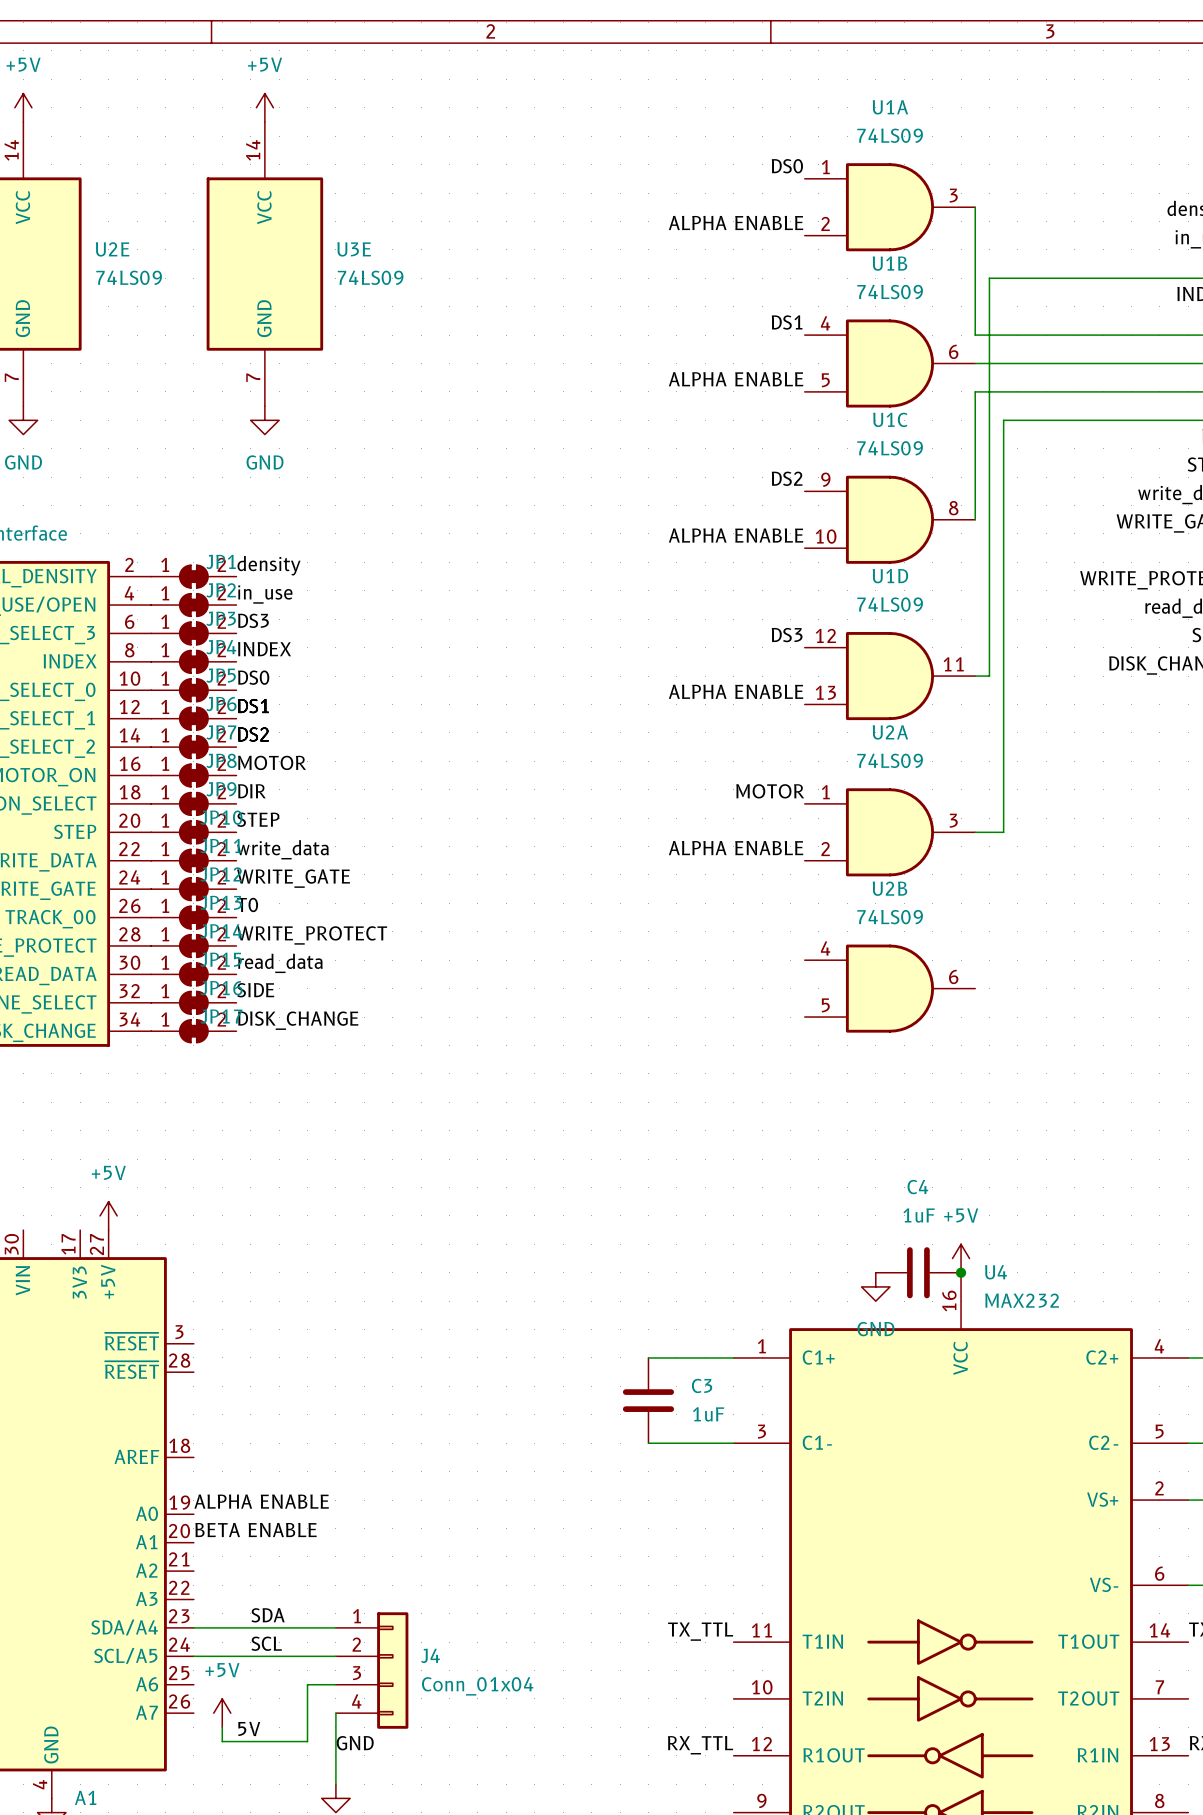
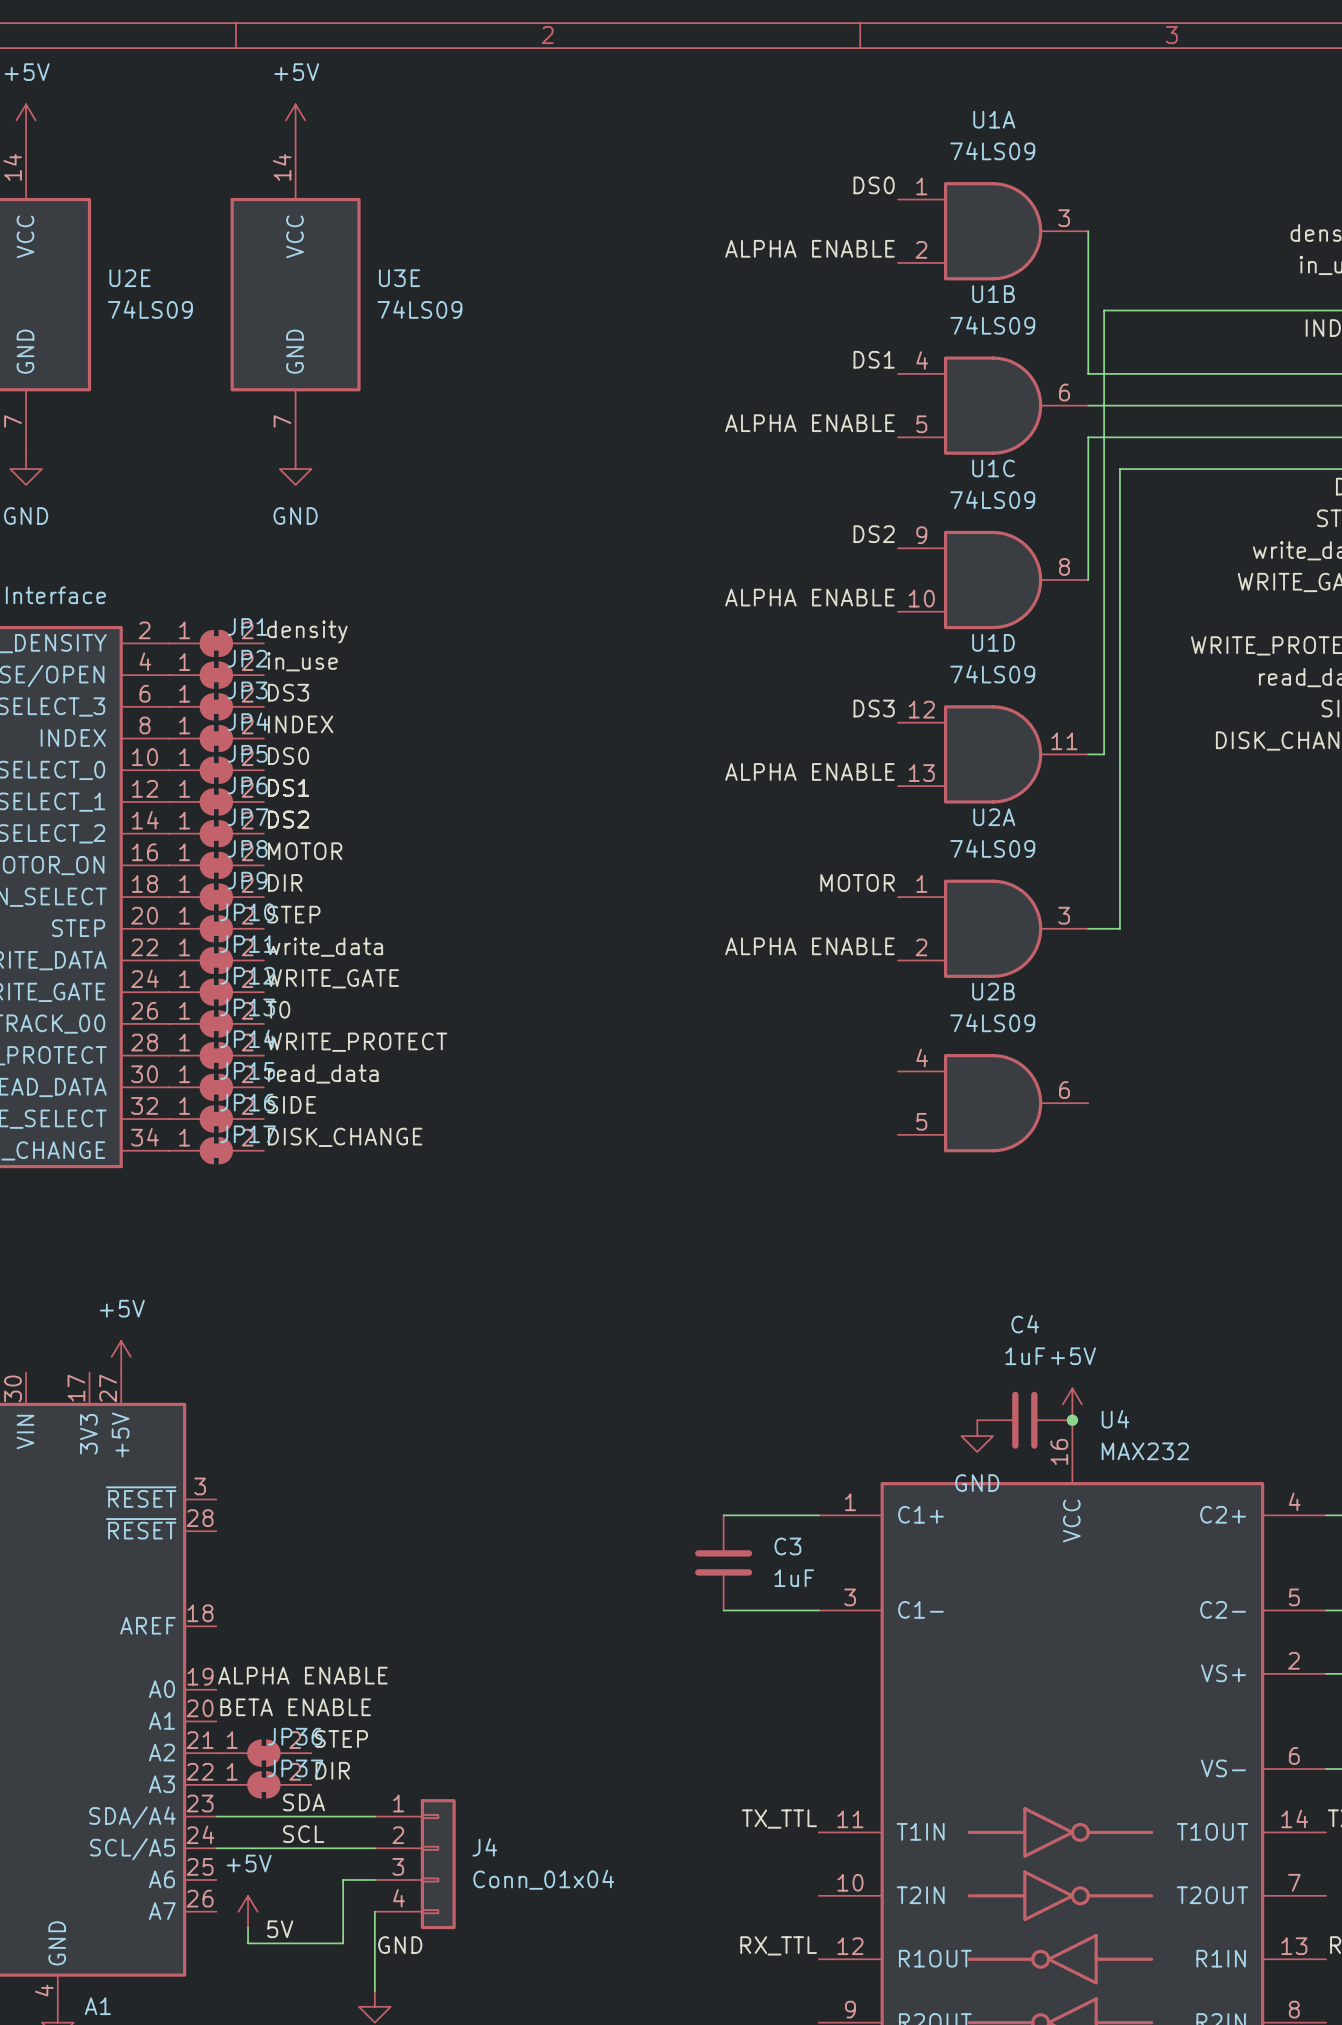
label: none -> STEP (341, 1739)
JP36: none -> (263, 1753)
label: none -> DIR (332, 1770)
JP37: none -> (263, 1784)

